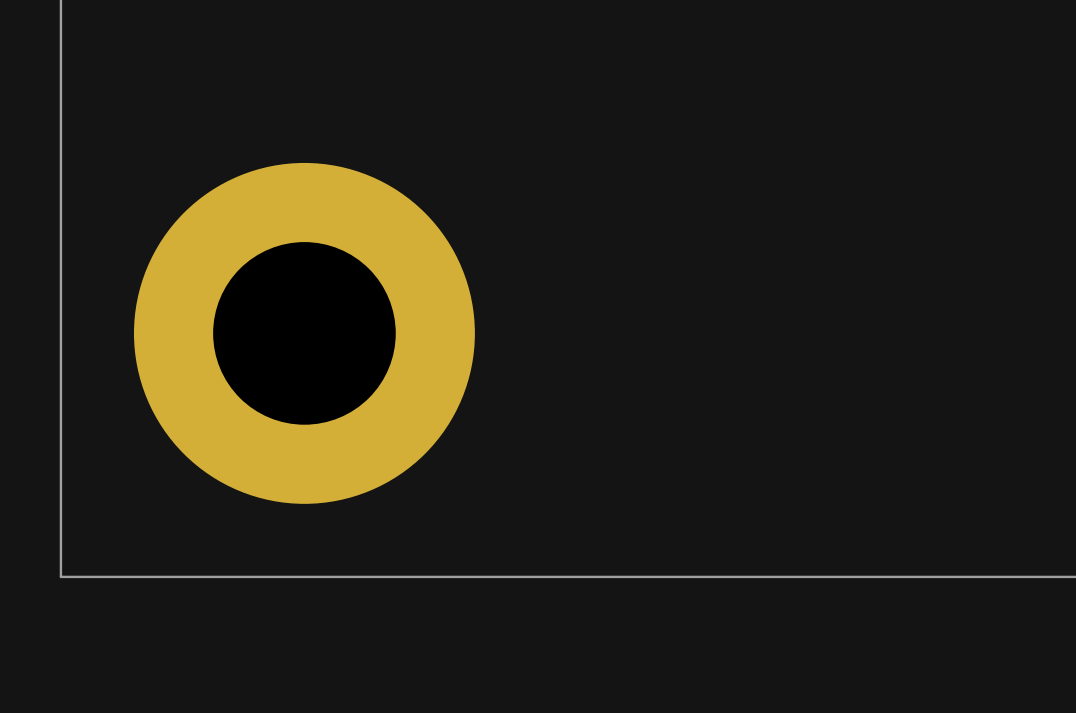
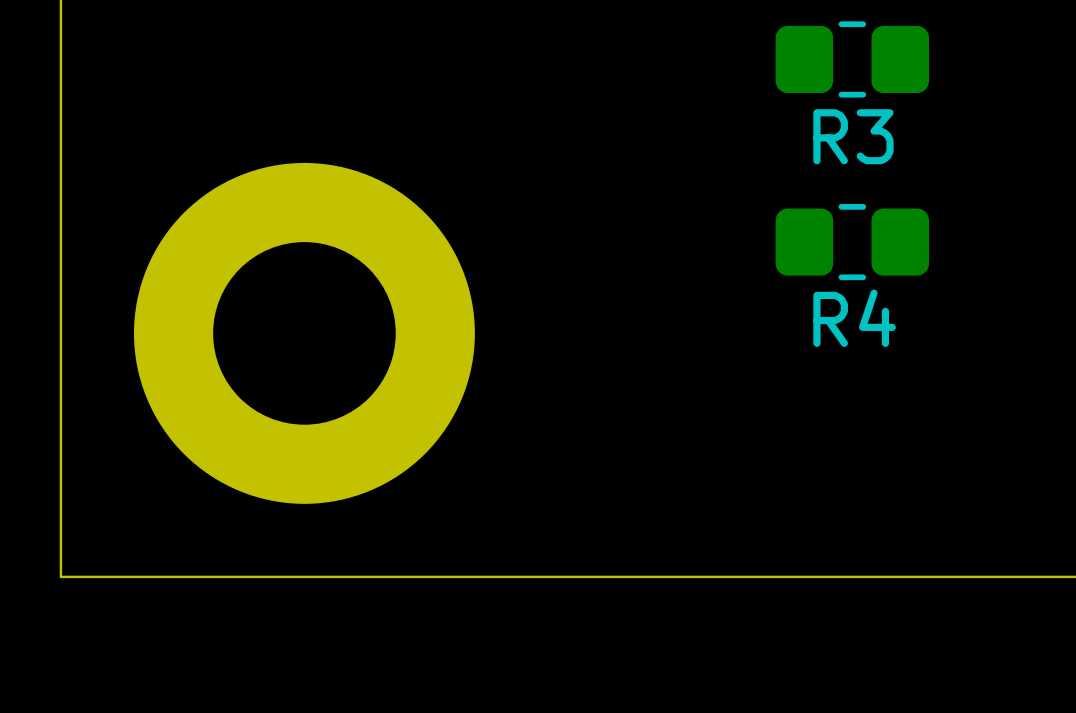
R3: none -> (852, 59)
R4: none -> (852, 242)

